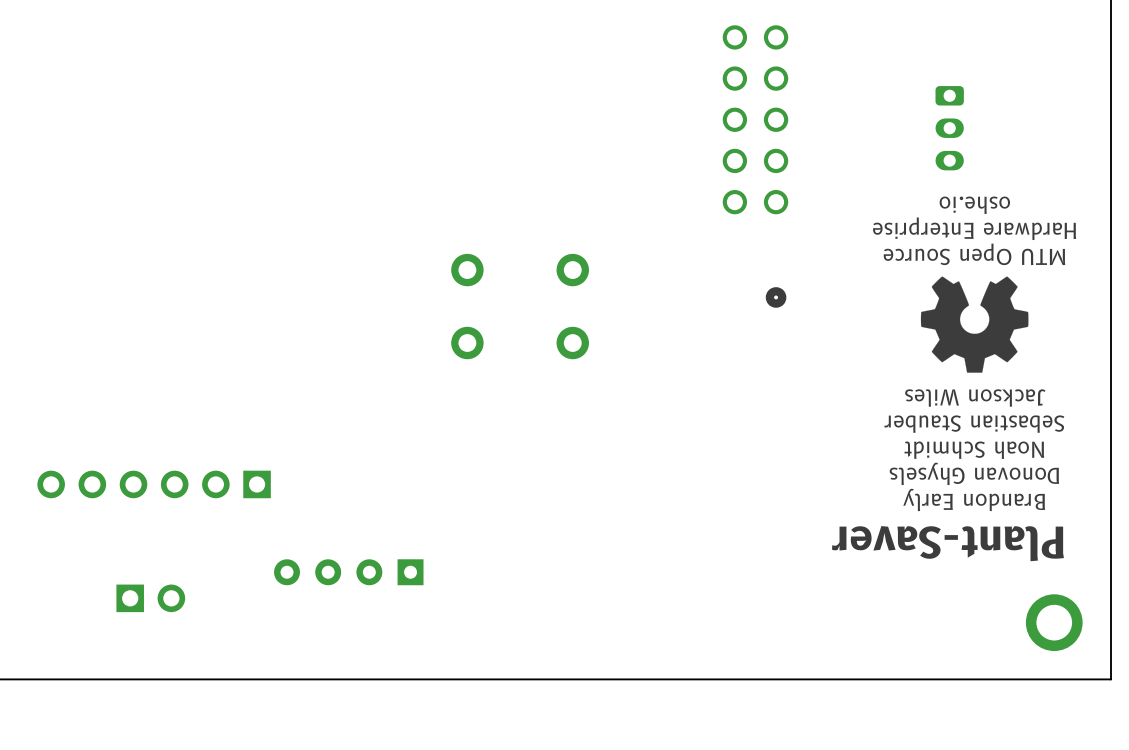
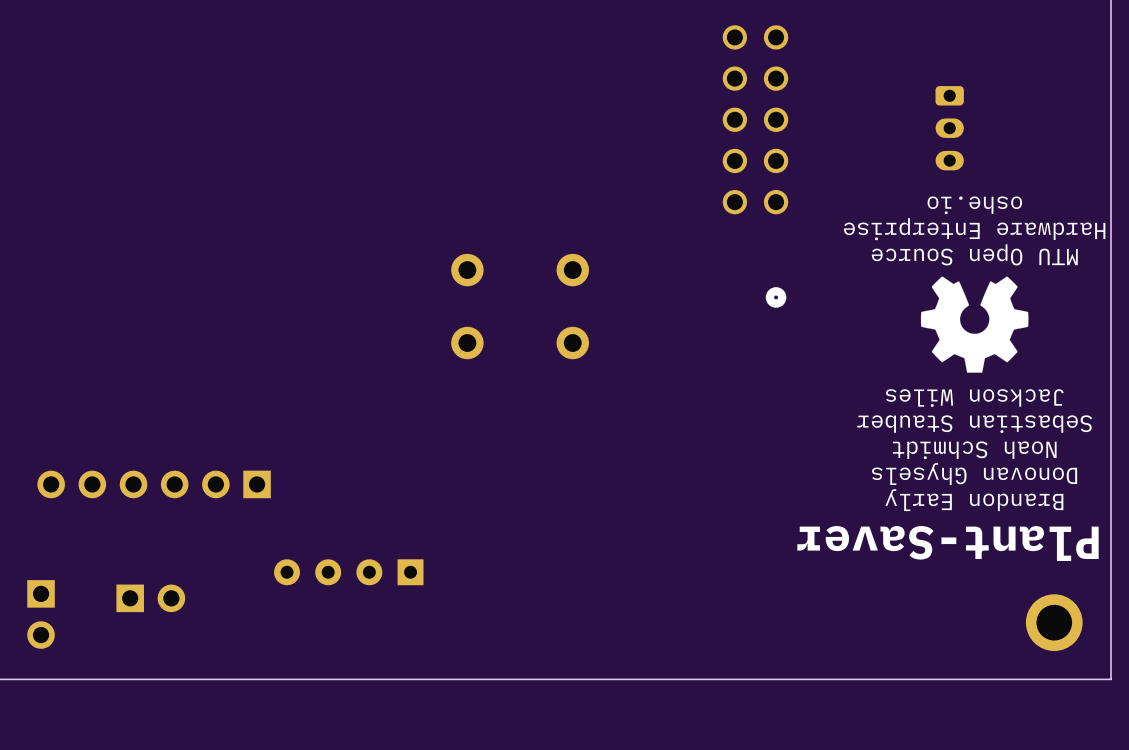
part: none -> (41, 614)

